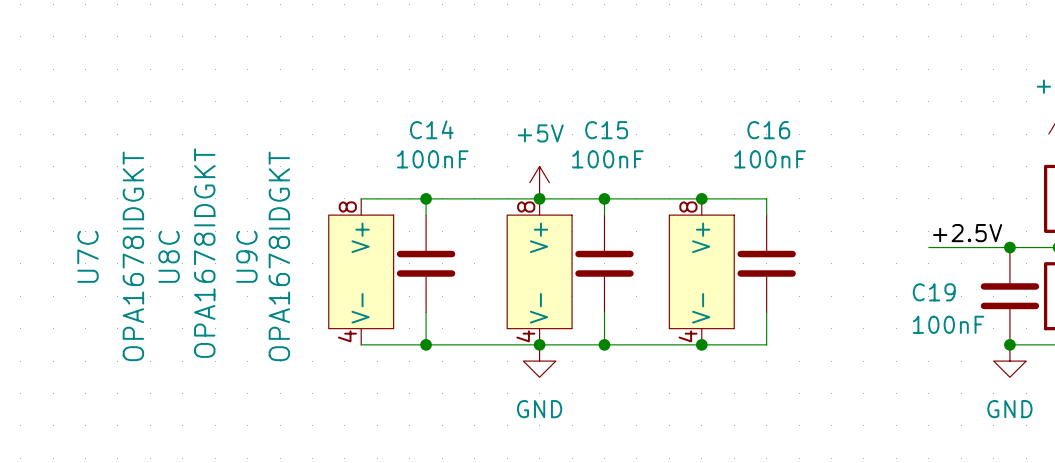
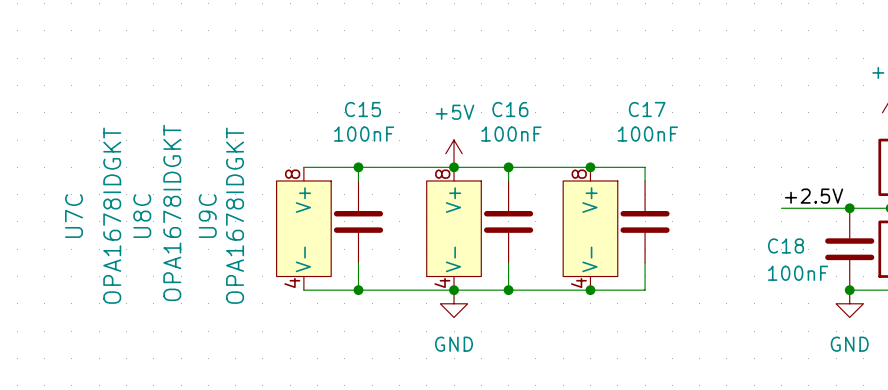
C14 name: C14 (431, 129) -> C15 (363, 109)
C15 name: C15 (606, 130) -> C16 (510, 109)
C16 name: C16 (768, 130) -> C17 (647, 109)
C19 name: C19 (934, 292) -> C18 (786, 245)

